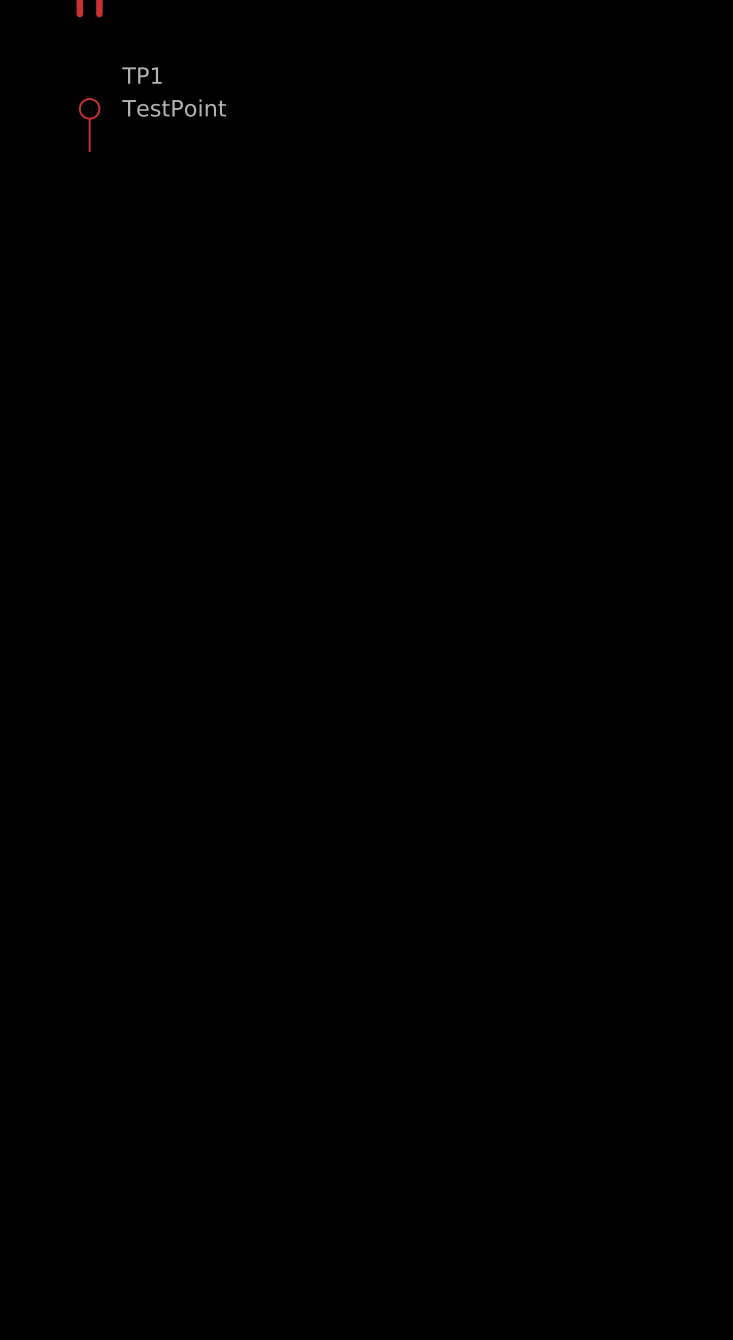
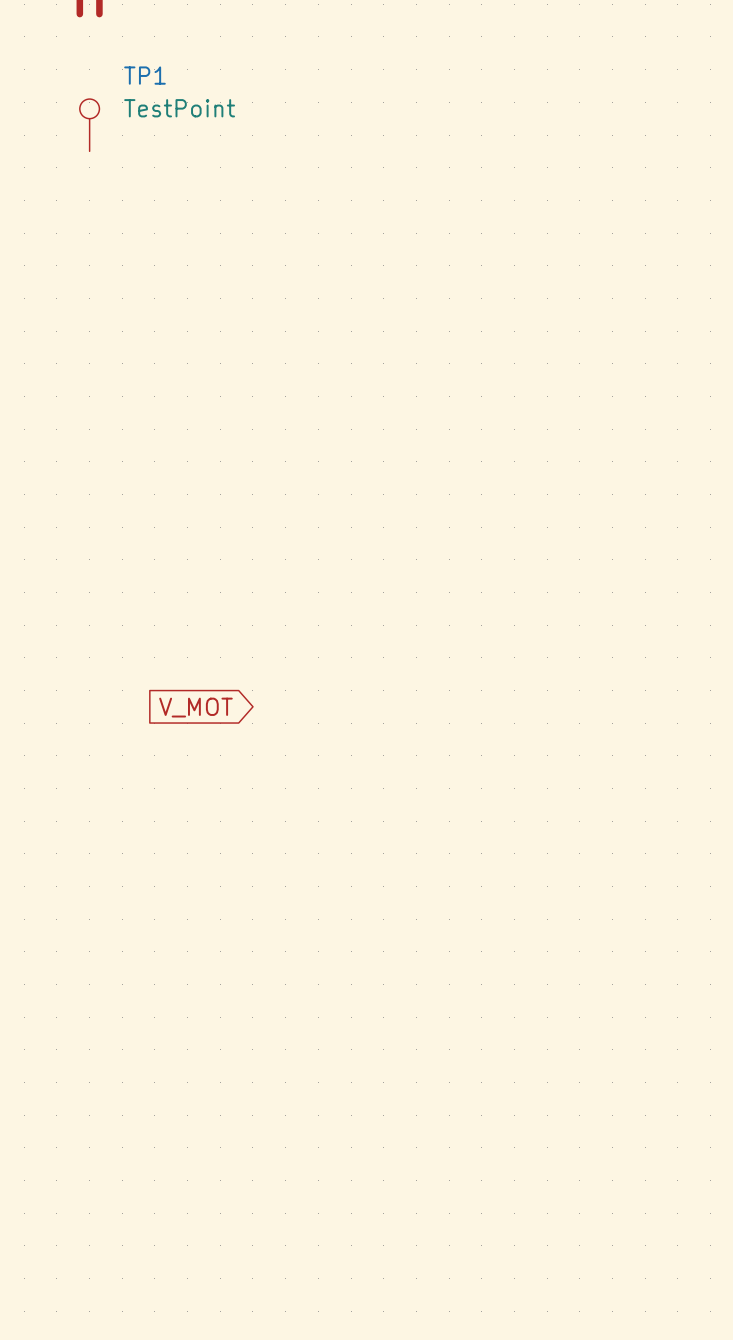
global label: none -> V_MOT (195, 707)

